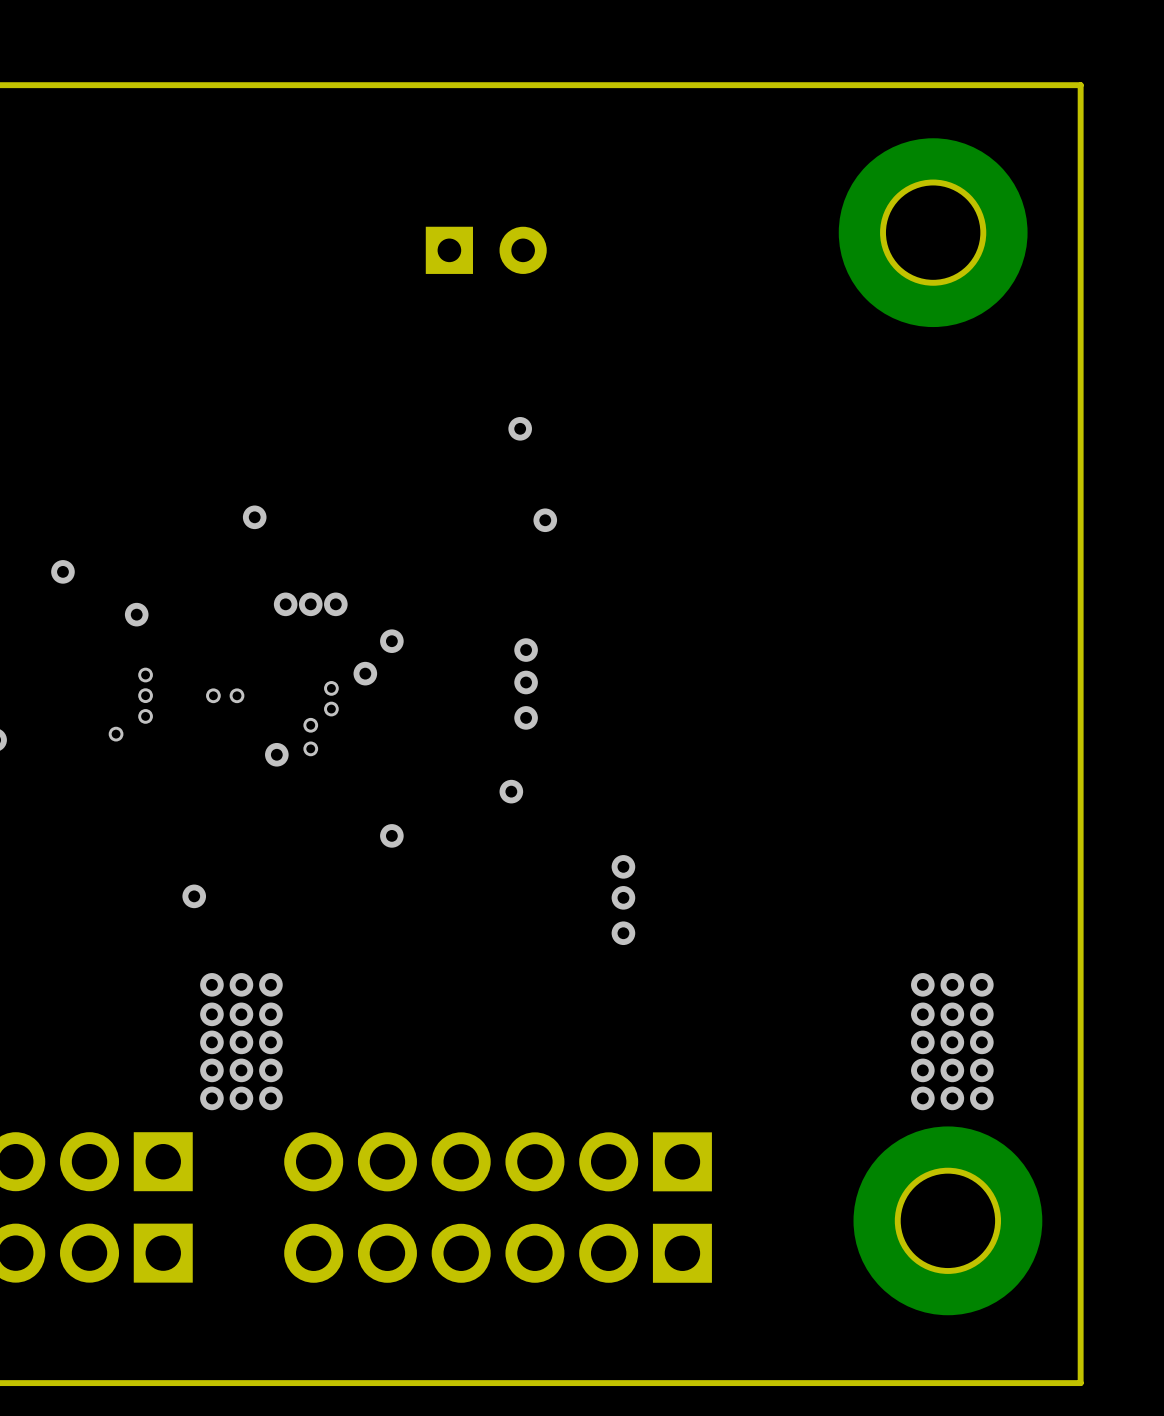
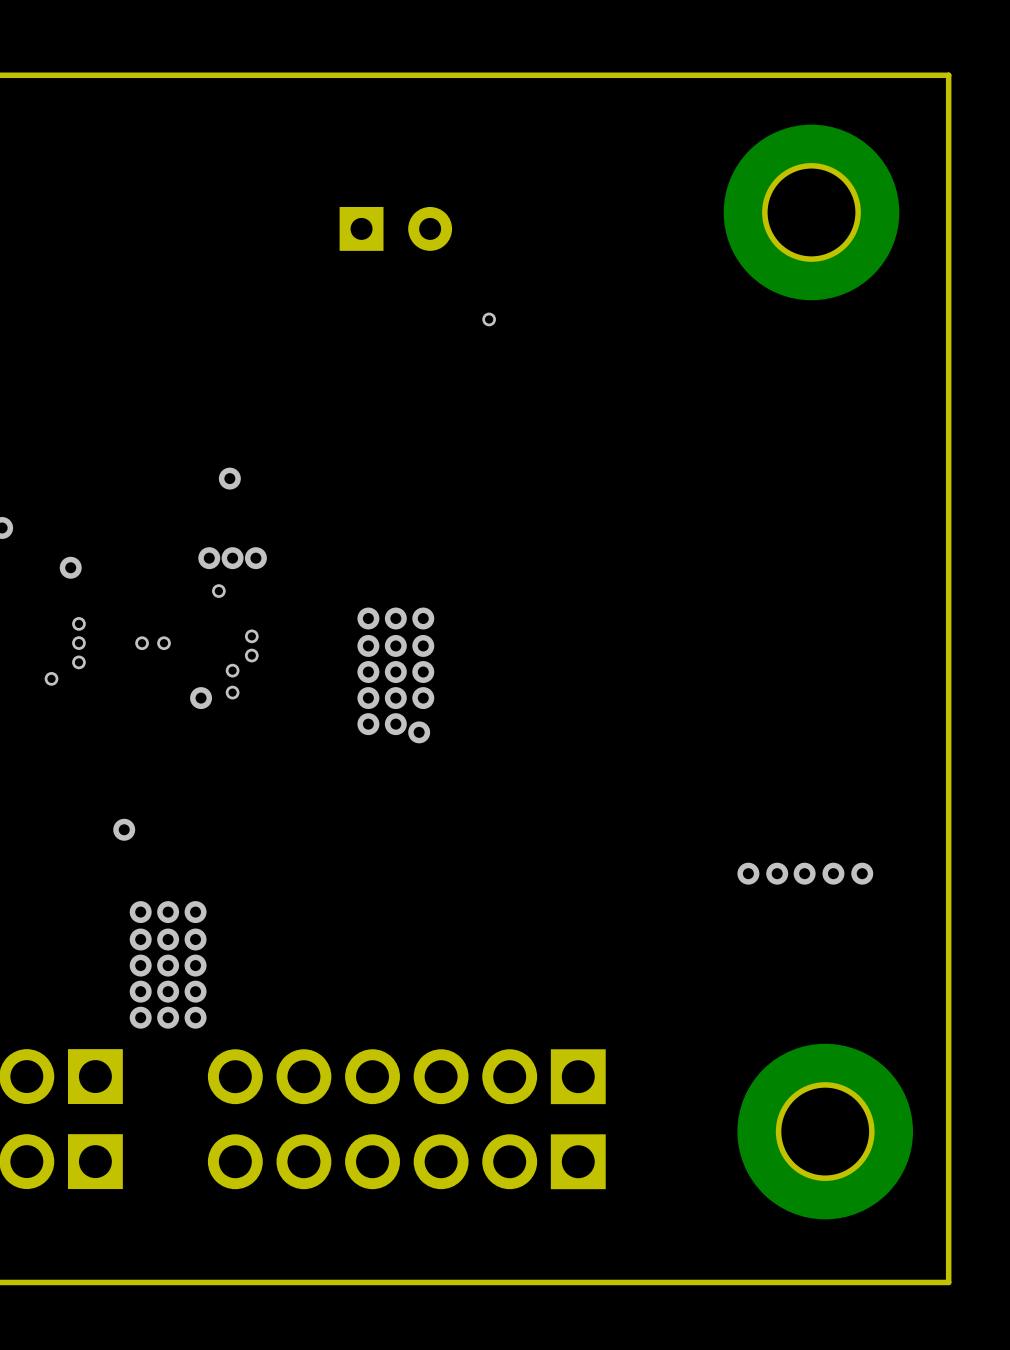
via: none -> (489, 319)
via: (520, 428) -> none
via position: (254, 517) -> (229, 478)
via: (545, 520) -> none
via: none -> (218, 591)
via: (391, 641) -> none
via: (526, 650) -> none
via: none -> (368, 618)
via: none -> (395, 618)
via: none -> (423, 618)
via: (365, 673) -> none
via: (526, 682) -> none
via: none -> (368, 645)
via: none -> (395, 645)
via: none -> (423, 645)
via: (526, 717) -> none
via: none -> (368, 672)
via: none -> (395, 672)
via: none -> (423, 672)
via: none -> (368, 698)
via: none -> (395, 698)
via: none -> (423, 698)
via: none -> (368, 724)
via: none -> (395, 724)
via: (391, 835) -> none
via: (623, 866) -> none
via: (623, 897) -> none
via: (623, 933) -> none
via: none -> (748, 873)
via: none -> (777, 873)
via: none -> (804, 873)
via: none -> (833, 873)
via: none -> (862, 873)
via: (922, 984) -> none
via: (952, 984) -> none
via: (981, 984) -> none
via: (922, 1014) -> none
via: (952, 1014) -> none
via: (981, 1014) -> none
via: (922, 1042) -> none
via: (952, 1042) -> none
via: (981, 1042) -> none
via: (922, 1070) -> none
via: (952, 1070) -> none
via: (981, 1070) -> none
via: (922, 1098) -> none
via: (952, 1098) -> none
via: (981, 1098) -> none

